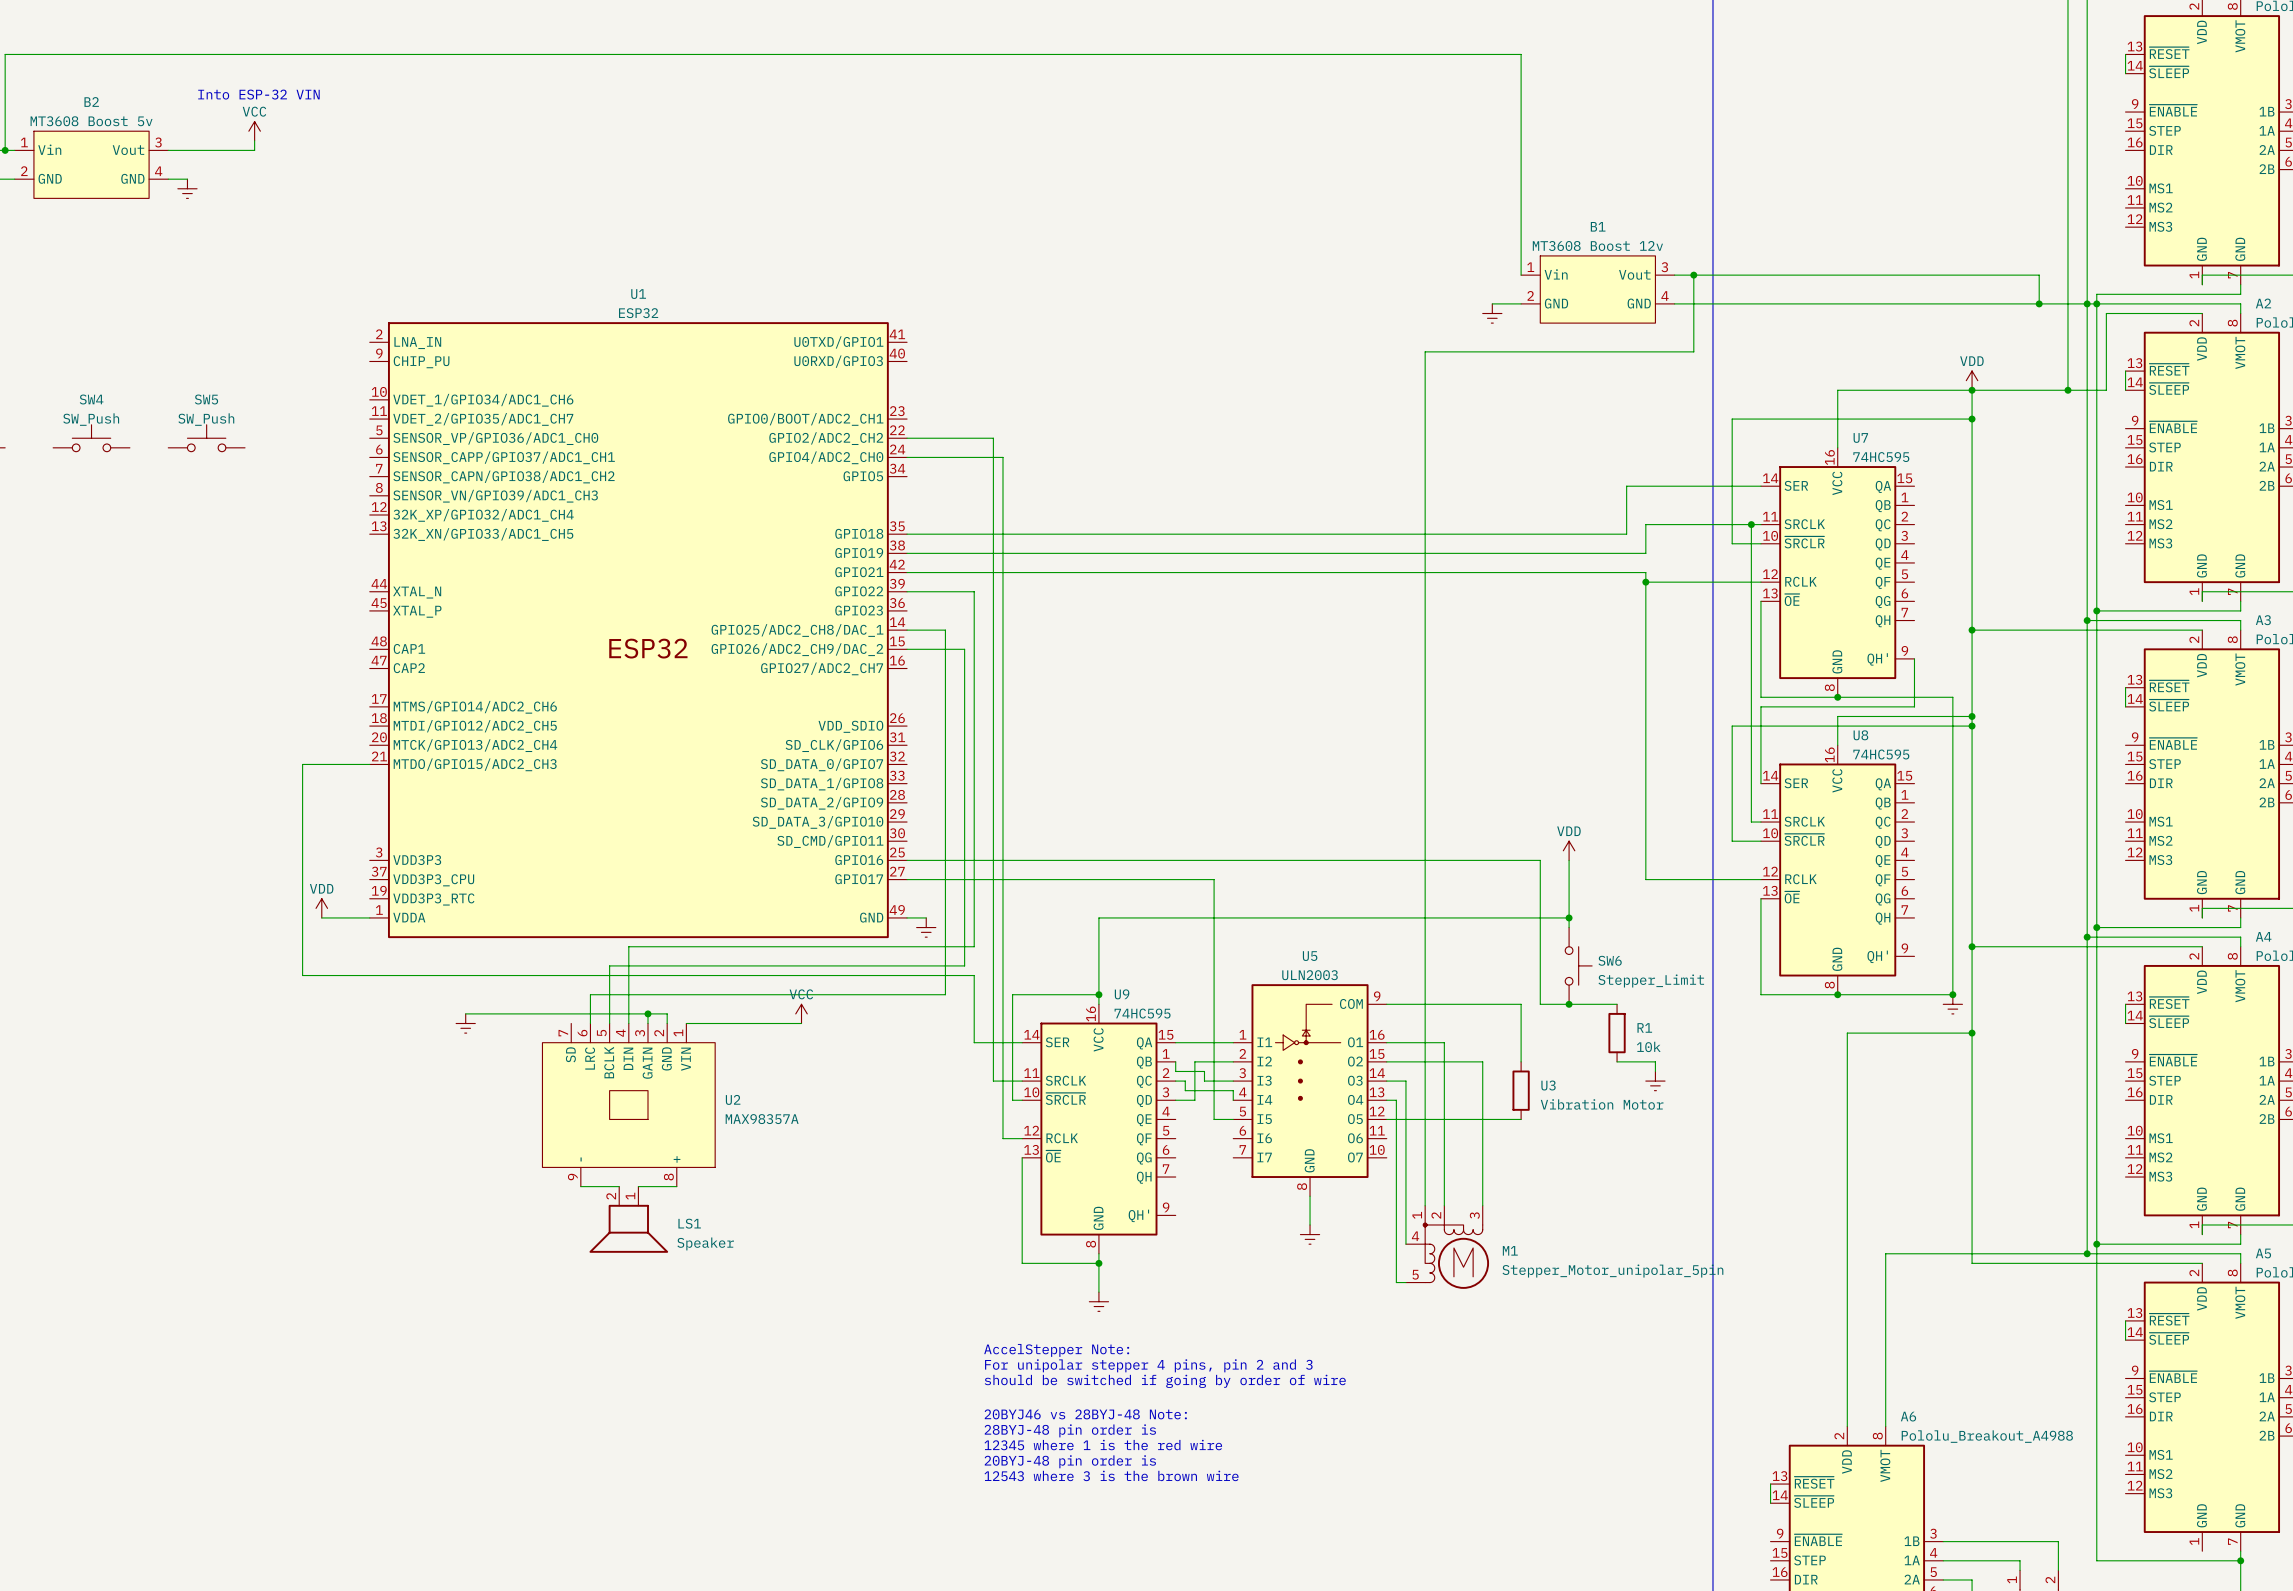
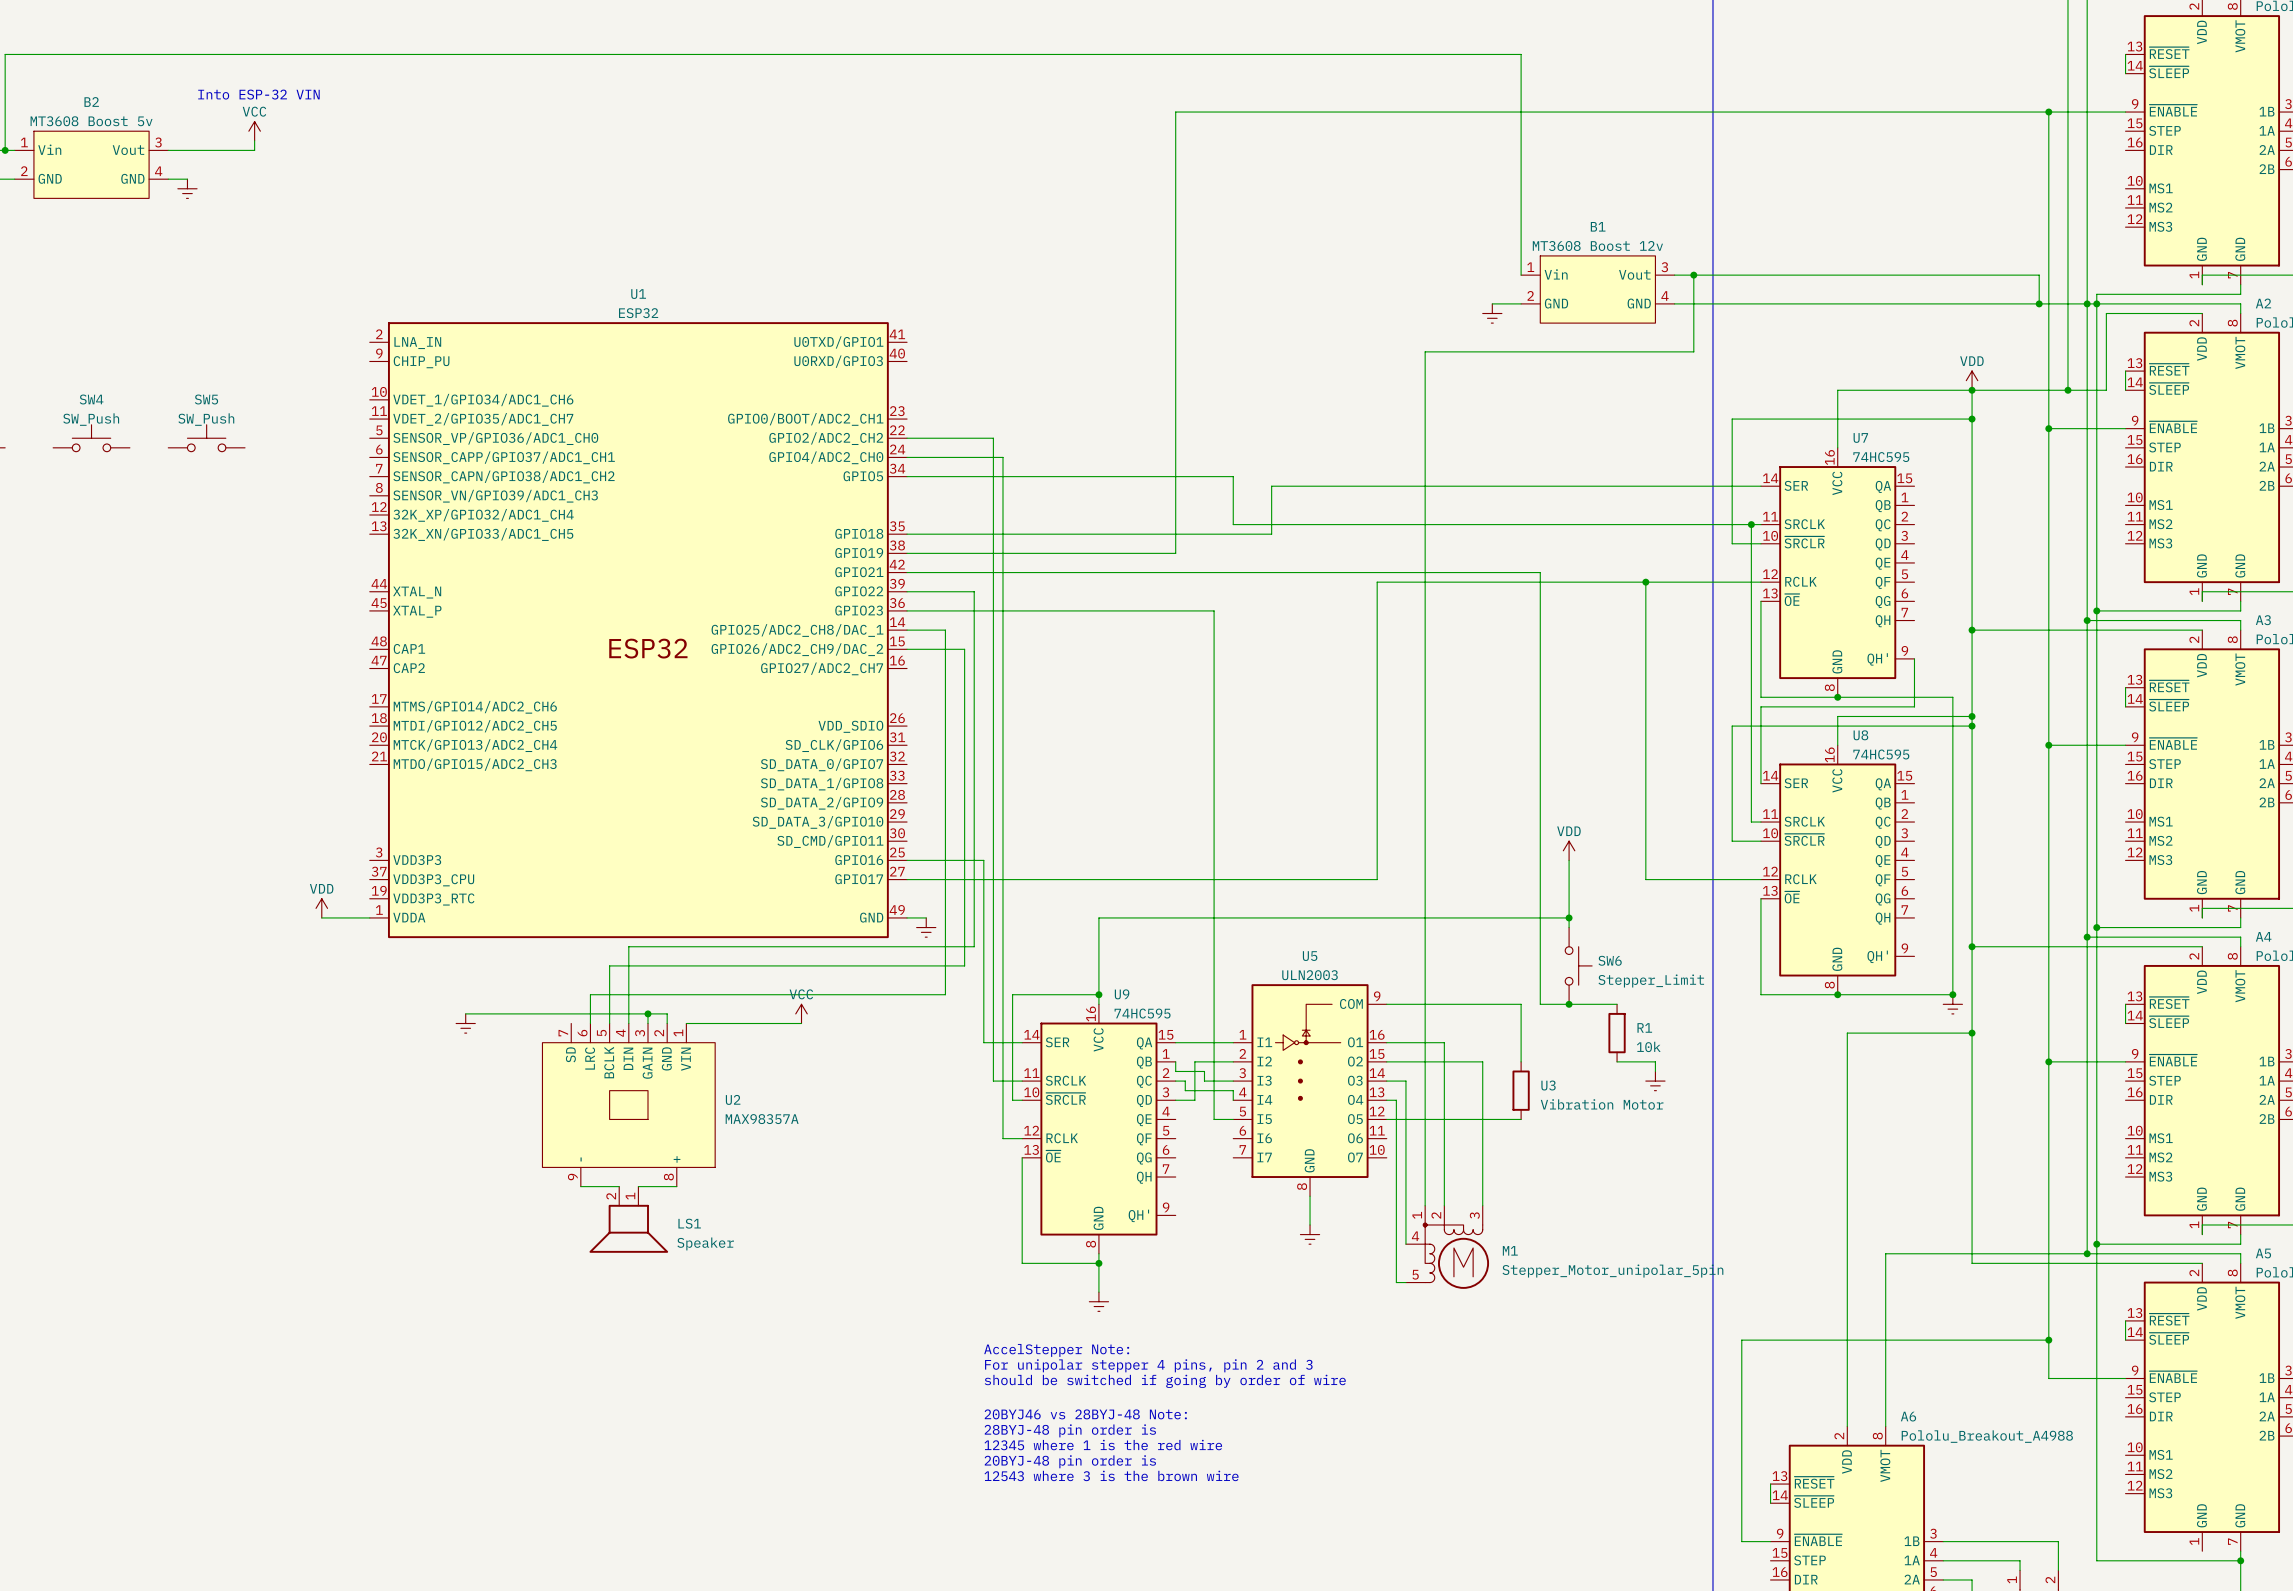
wire: none -> (2048, 112) (2048, 1378) (2125, 1378)
junction: none -> (2048, 112)
wire: none -> (2125, 112) (1175, 112) (1175, 553)
wire: none -> (2048, 428) (2125, 428)
junction: none -> (2048, 428)
wire: (1626, 486) (1626, 534) (1271, 534) -> (1626, 486) (1271, 486) (1271, 534)
wire: (1645, 524) (1645, 553) (1175, 553) -> (1645, 524) (1233, 524) (1233, 476) (907, 476)
wire: (1540, 572) (1645, 572) (1645, 582) -> (1540, 572) (1540, 860)
wire: none -> (1645, 582) (1377, 582) (1377, 879) (1214, 879) (1214, 610) (907, 610)
wire: none -> (2048, 745) (2125, 745)
junction: none -> (2048, 745)
wire: (369, 764) (302, 764) (302, 975) (974, 975) (974, 1042) (983, 1042) -> none
wire: (983, 860) (1540, 860) -> (983, 860) (983, 1042)
wire: none -> (2048, 1061) (2125, 1061)
junction: none -> (2048, 1061)
wire: none -> (2048, 1340) (1741, 1340) (1741, 1541) (1770, 1541)
junction: none -> (2048, 1340)

